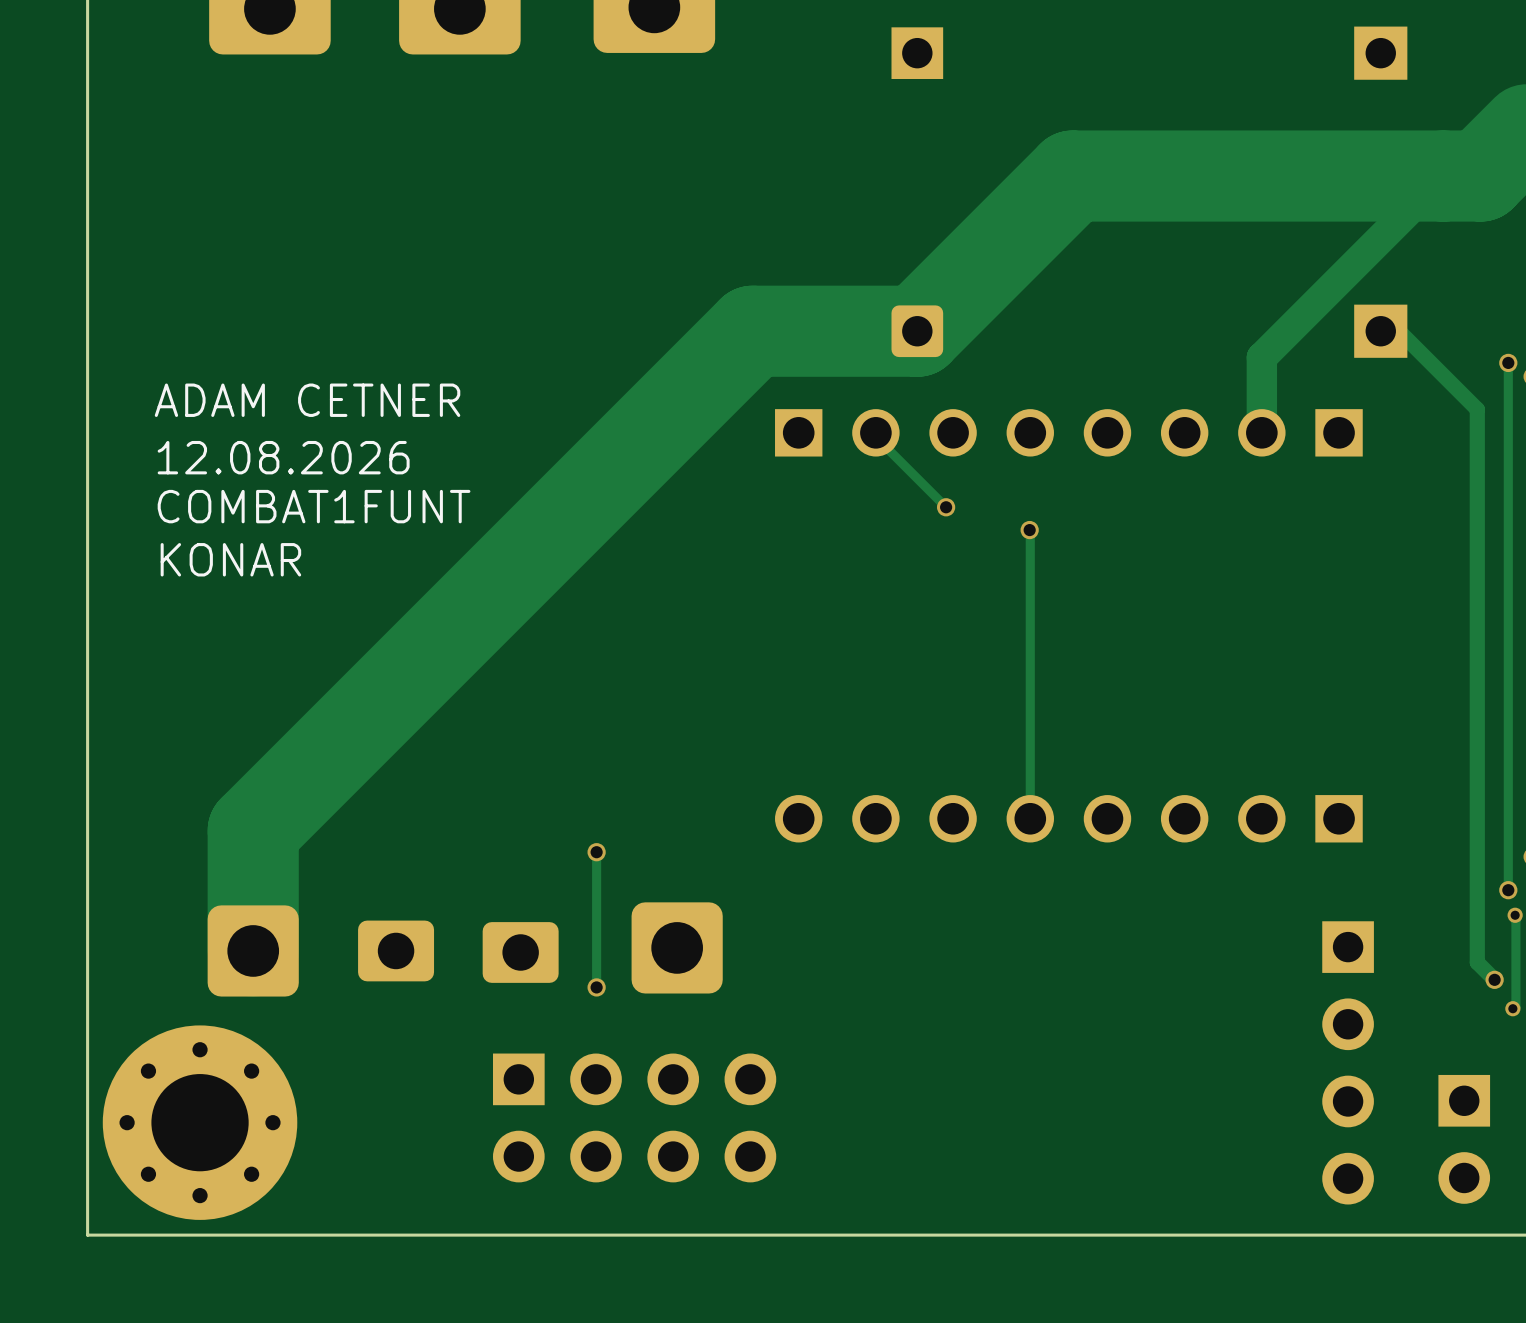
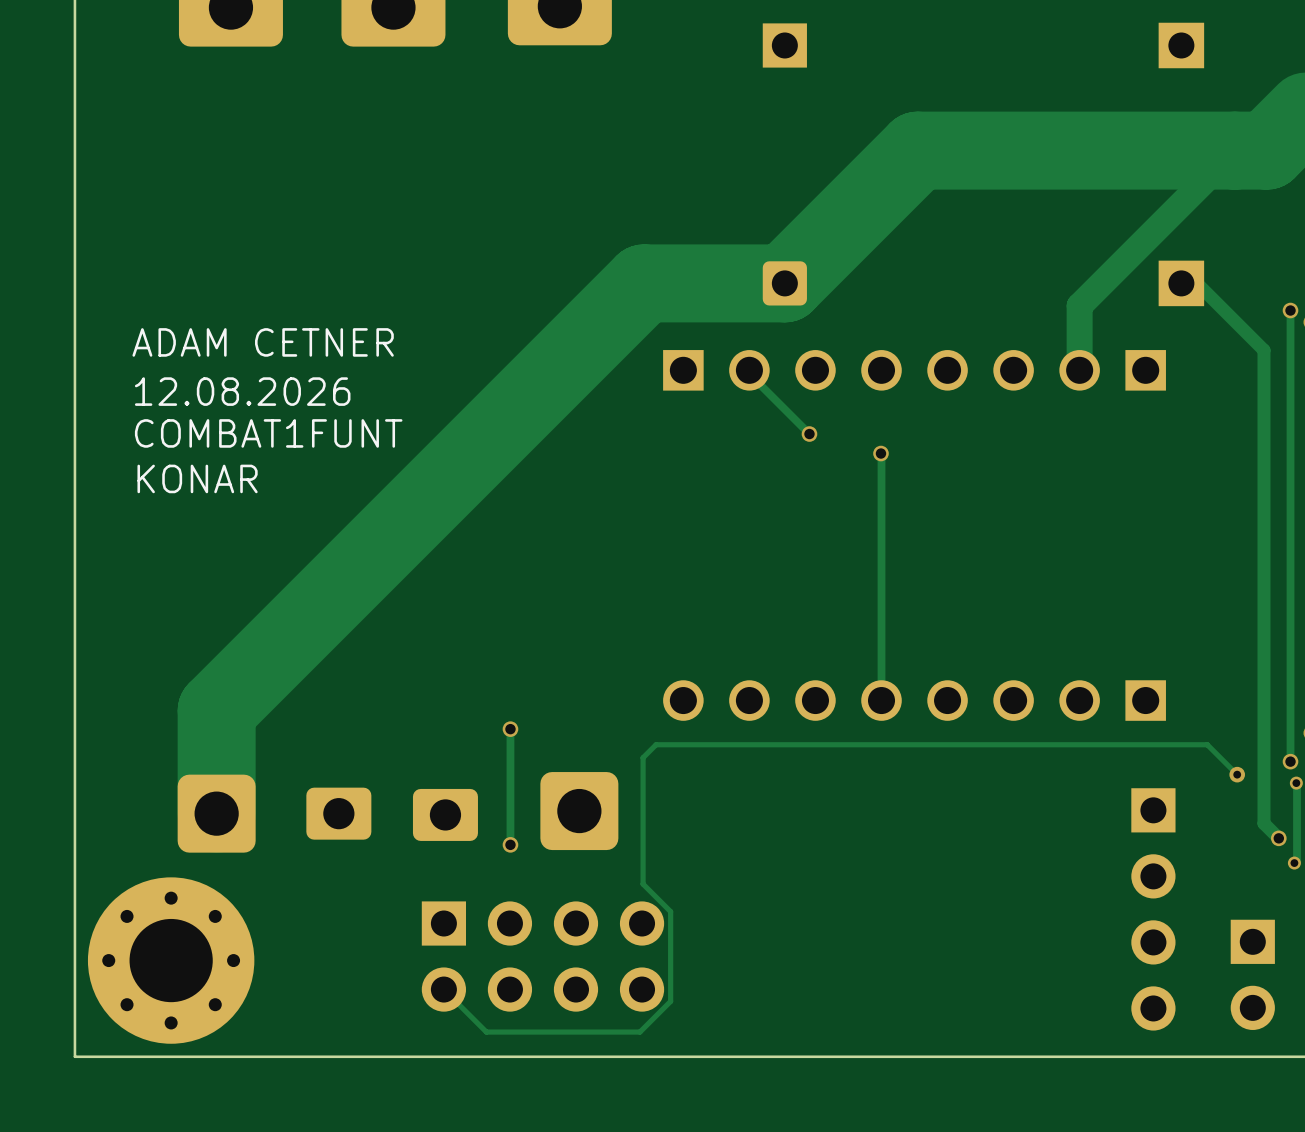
track: none -> (1237, 774) (1207, 744) (656, 744) (643, 757) (643, 884) (670, 911) (670, 1001) (639, 1032) (486, 1032) (443, 989)
via: none -> (1237, 774)

